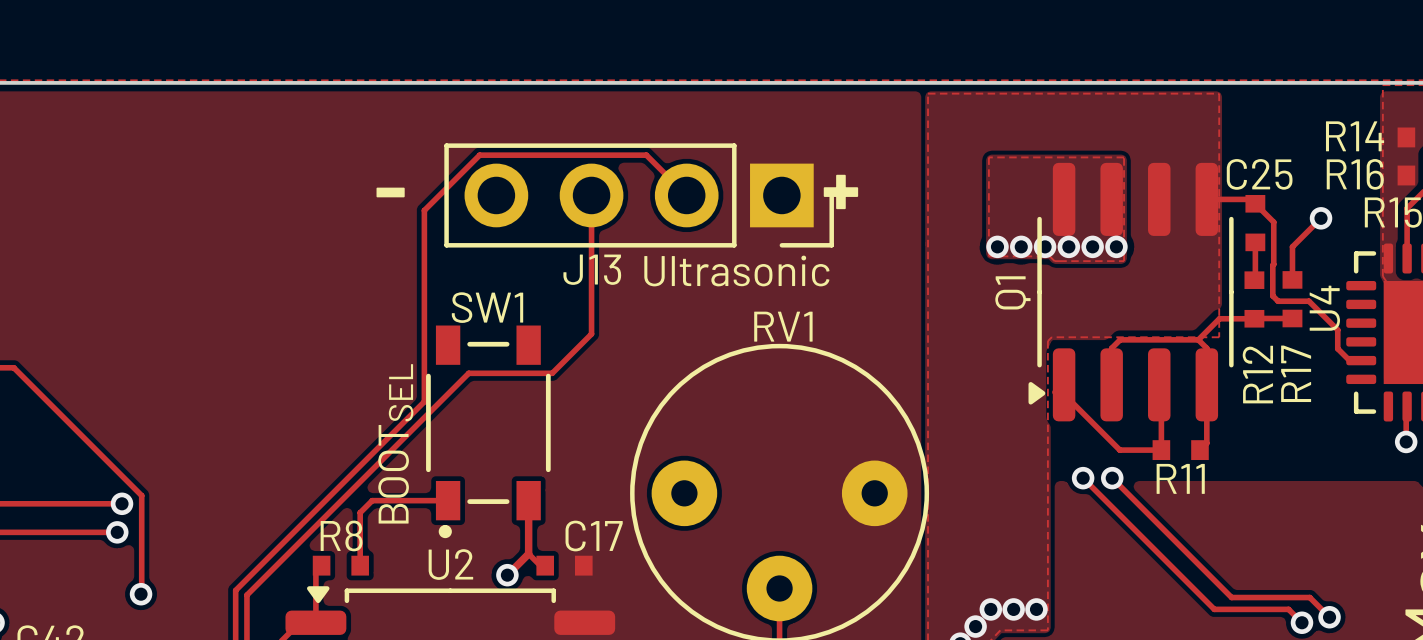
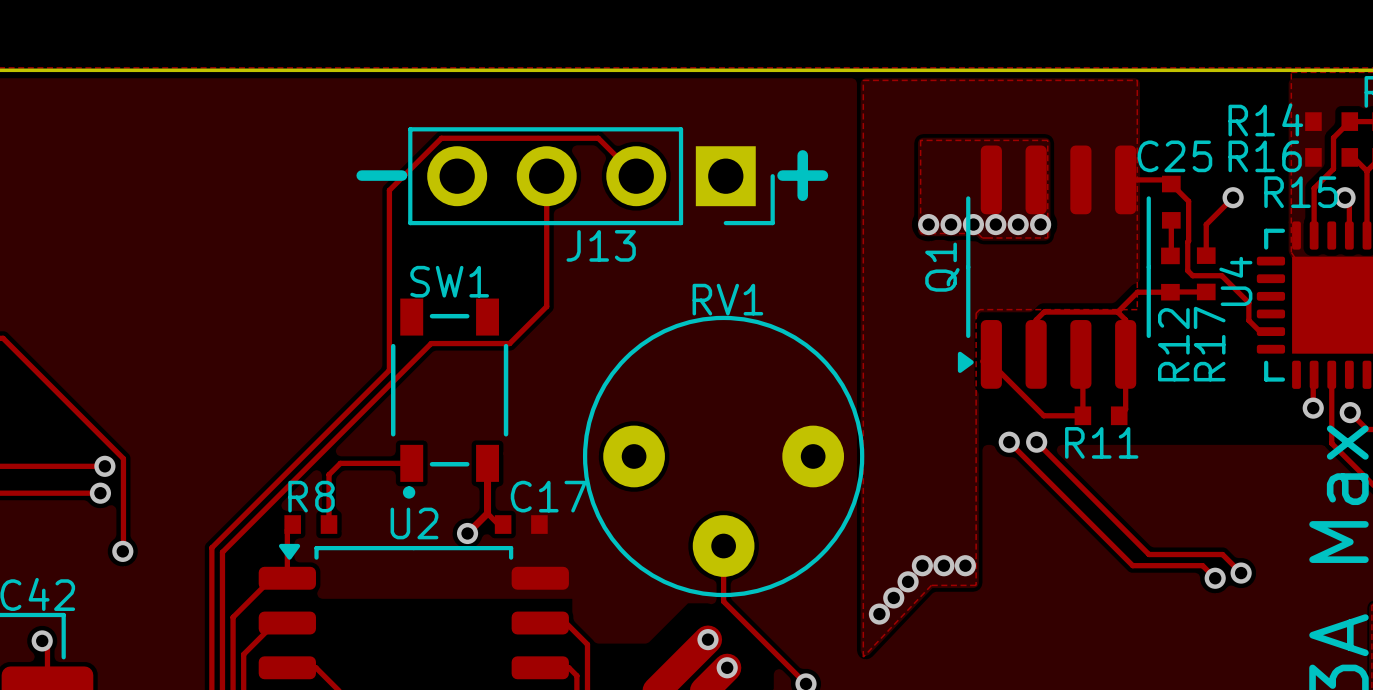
J13 name position: J13 (592, 269) -> J13 (601, 245)
text: Ultrasonic (736, 270) -> none
text: BOOTSEL (395, 443) -> none

